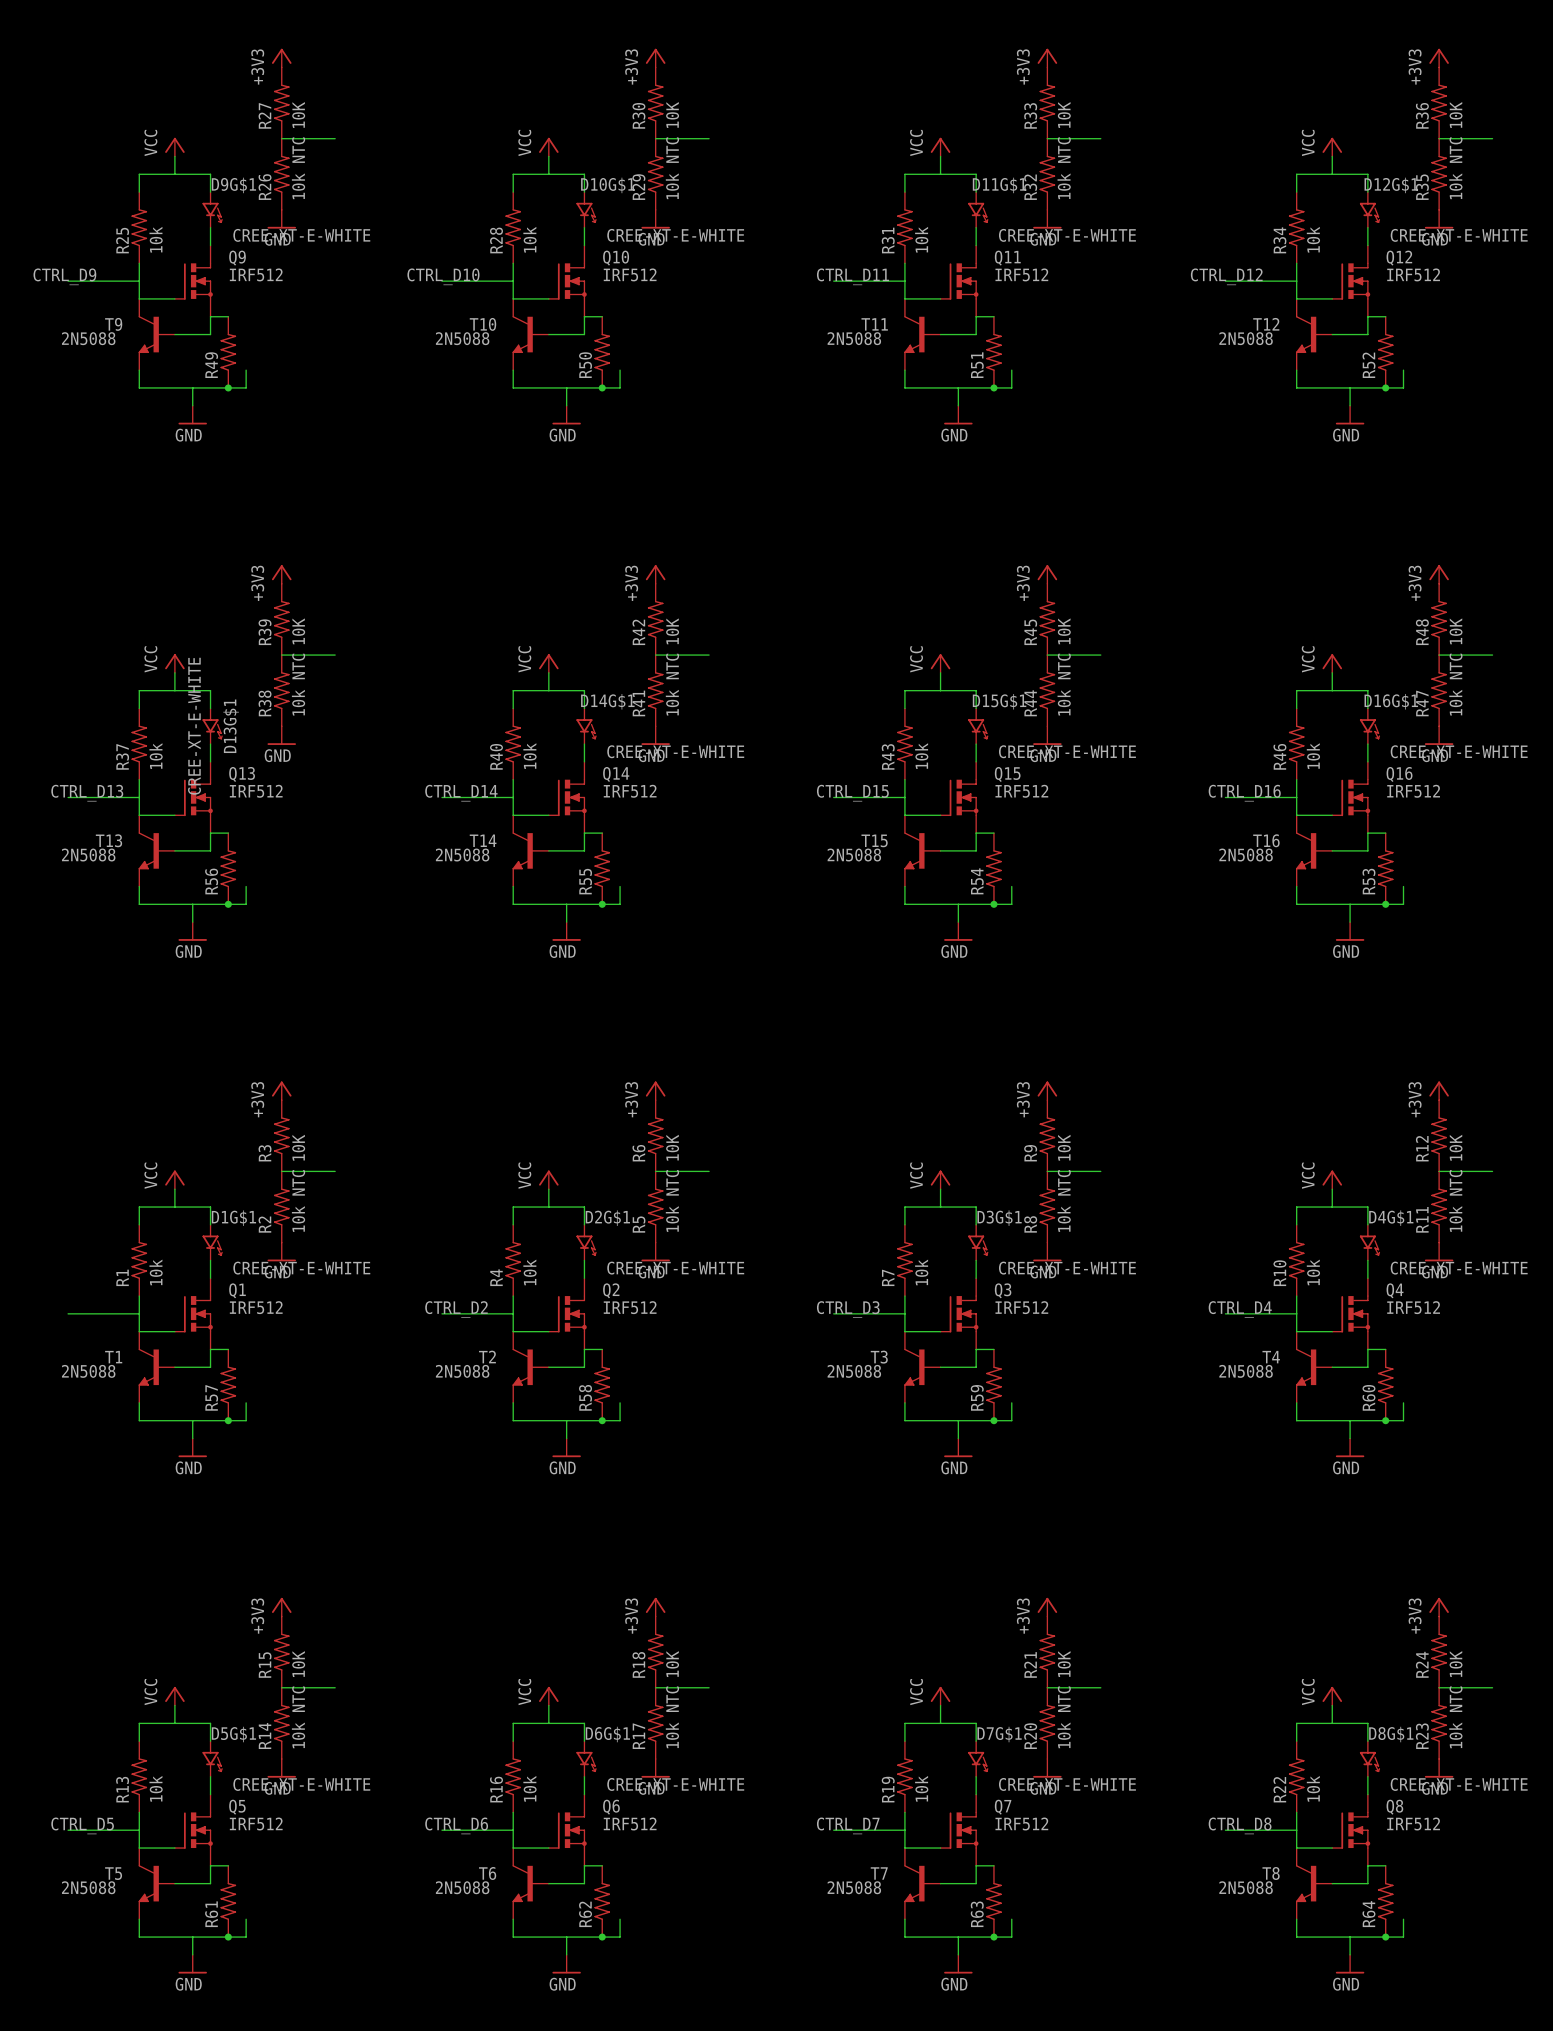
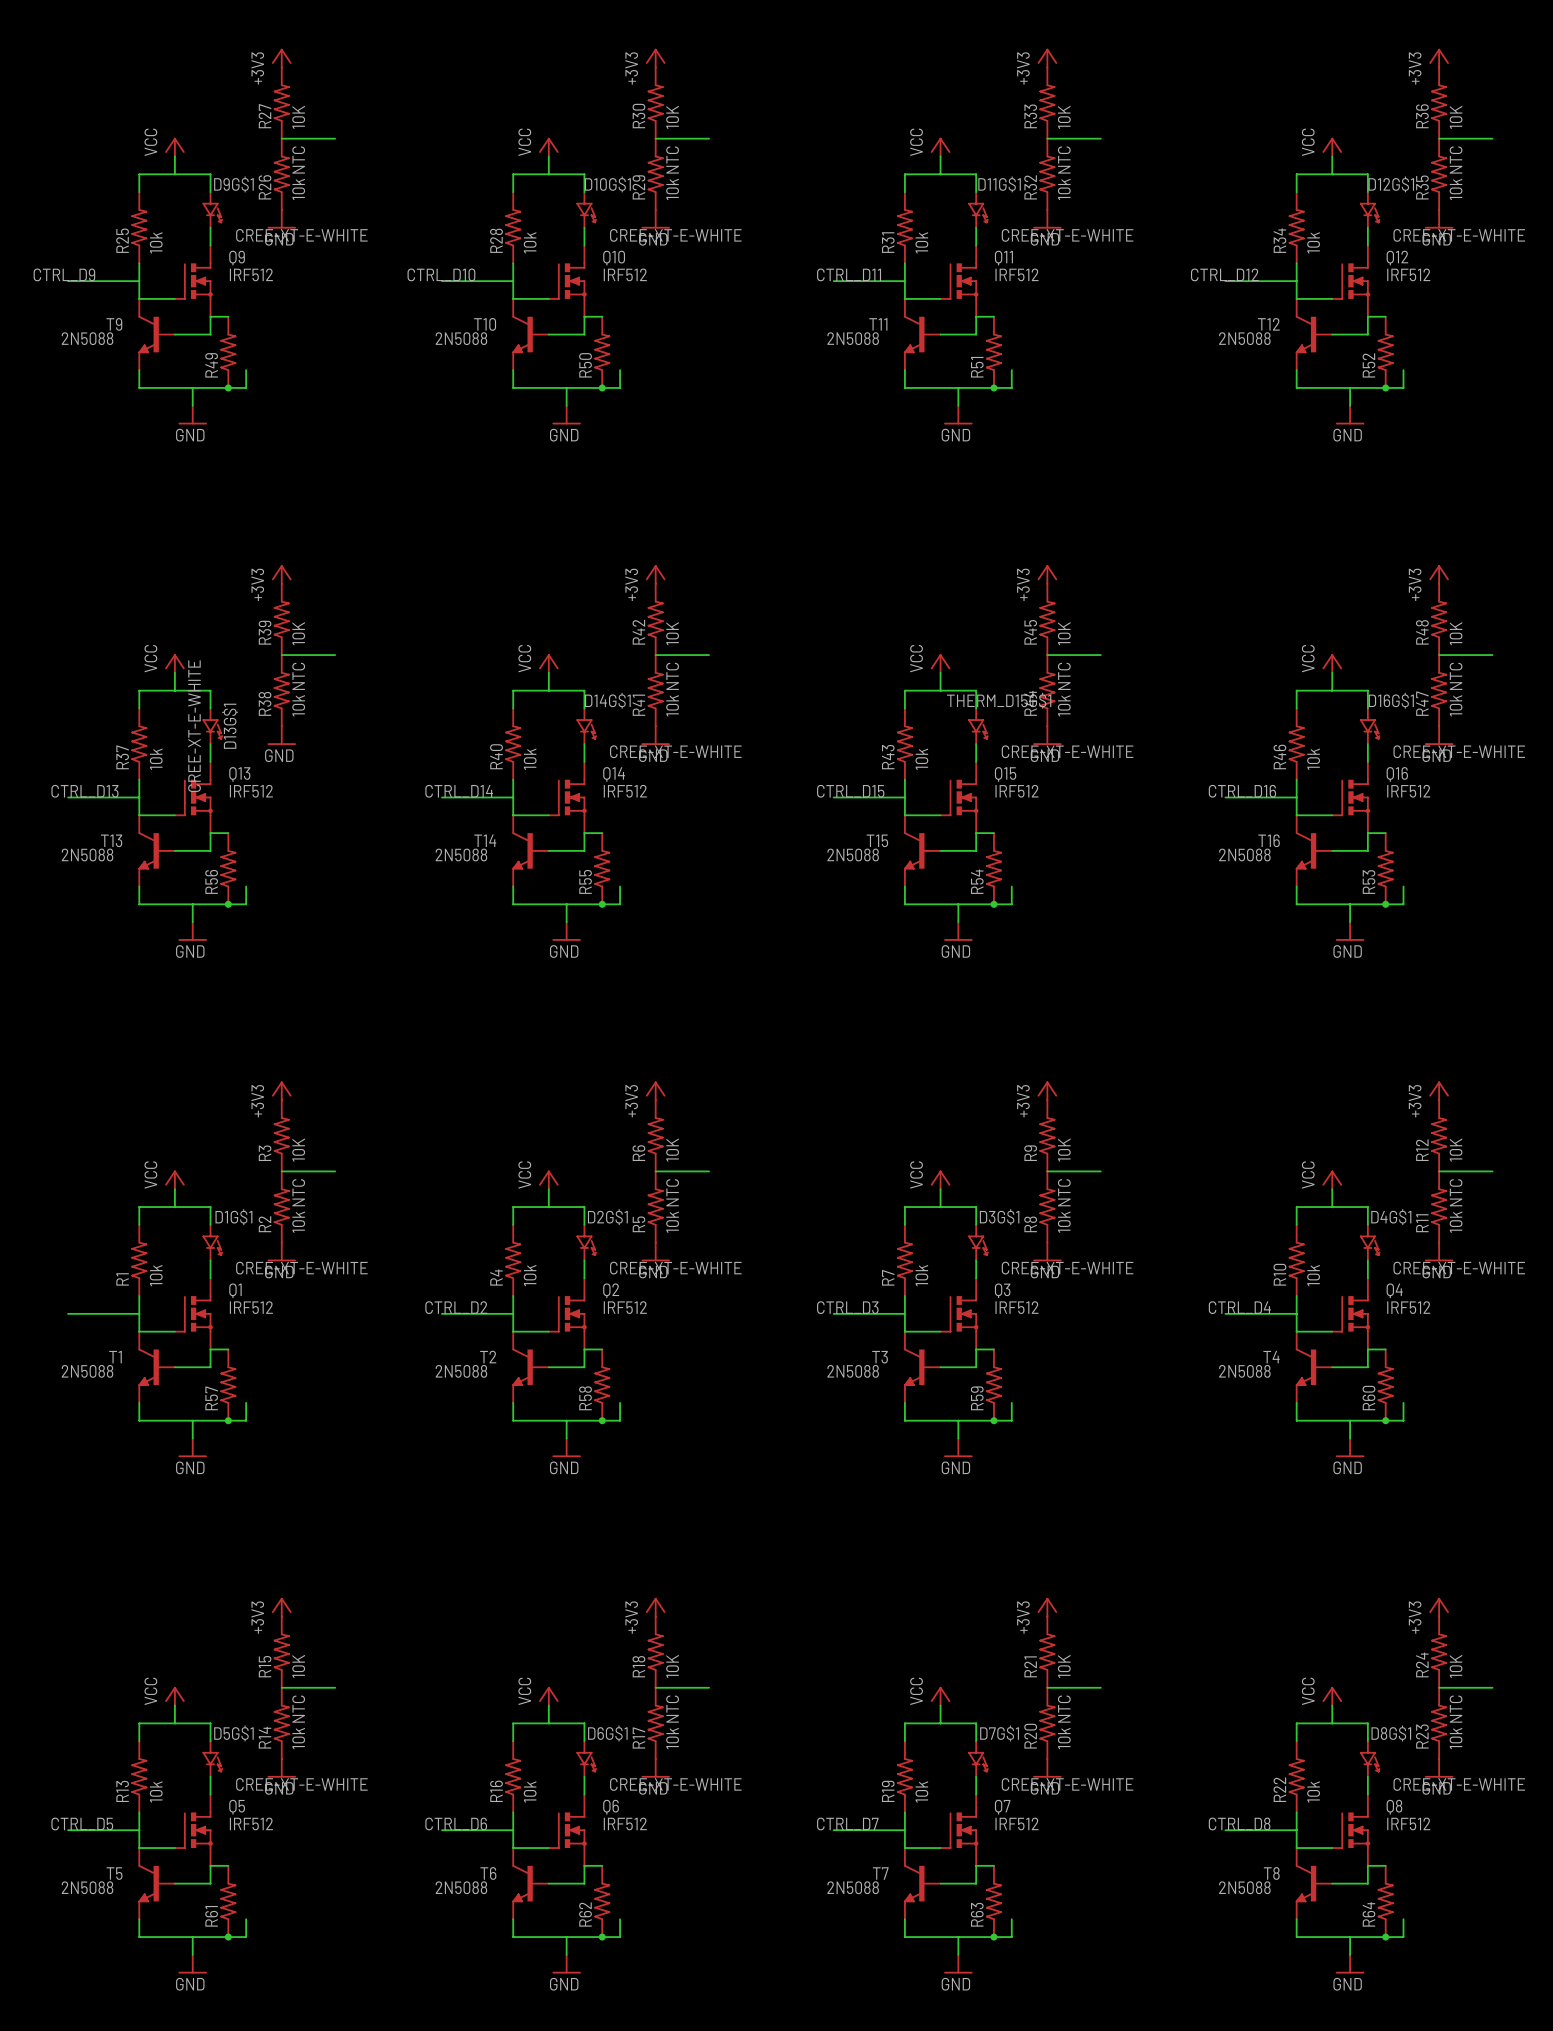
D15G$1 name: D15G$1 (999, 701) -> THERM_D15G$1 (999, 700)

